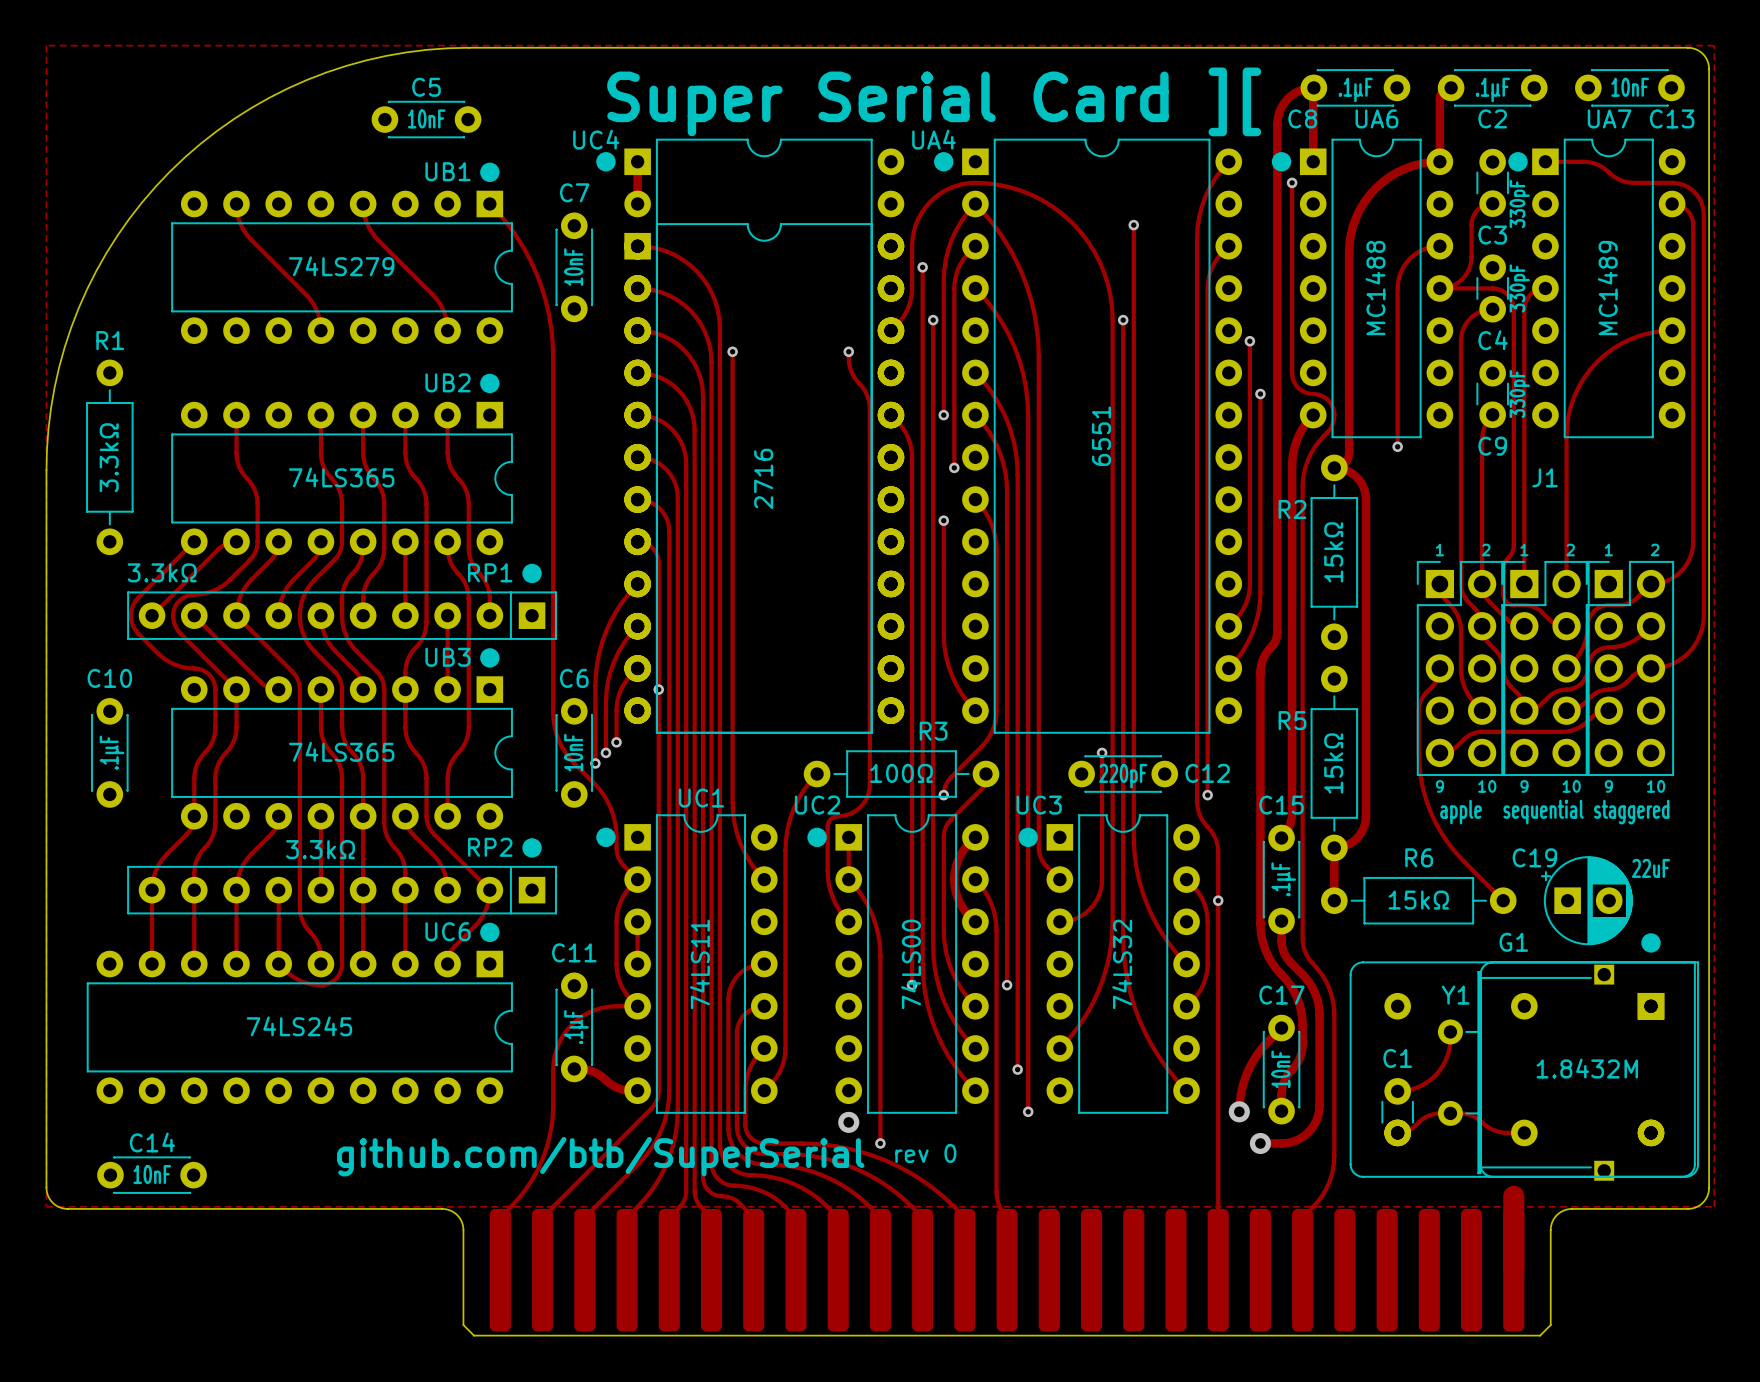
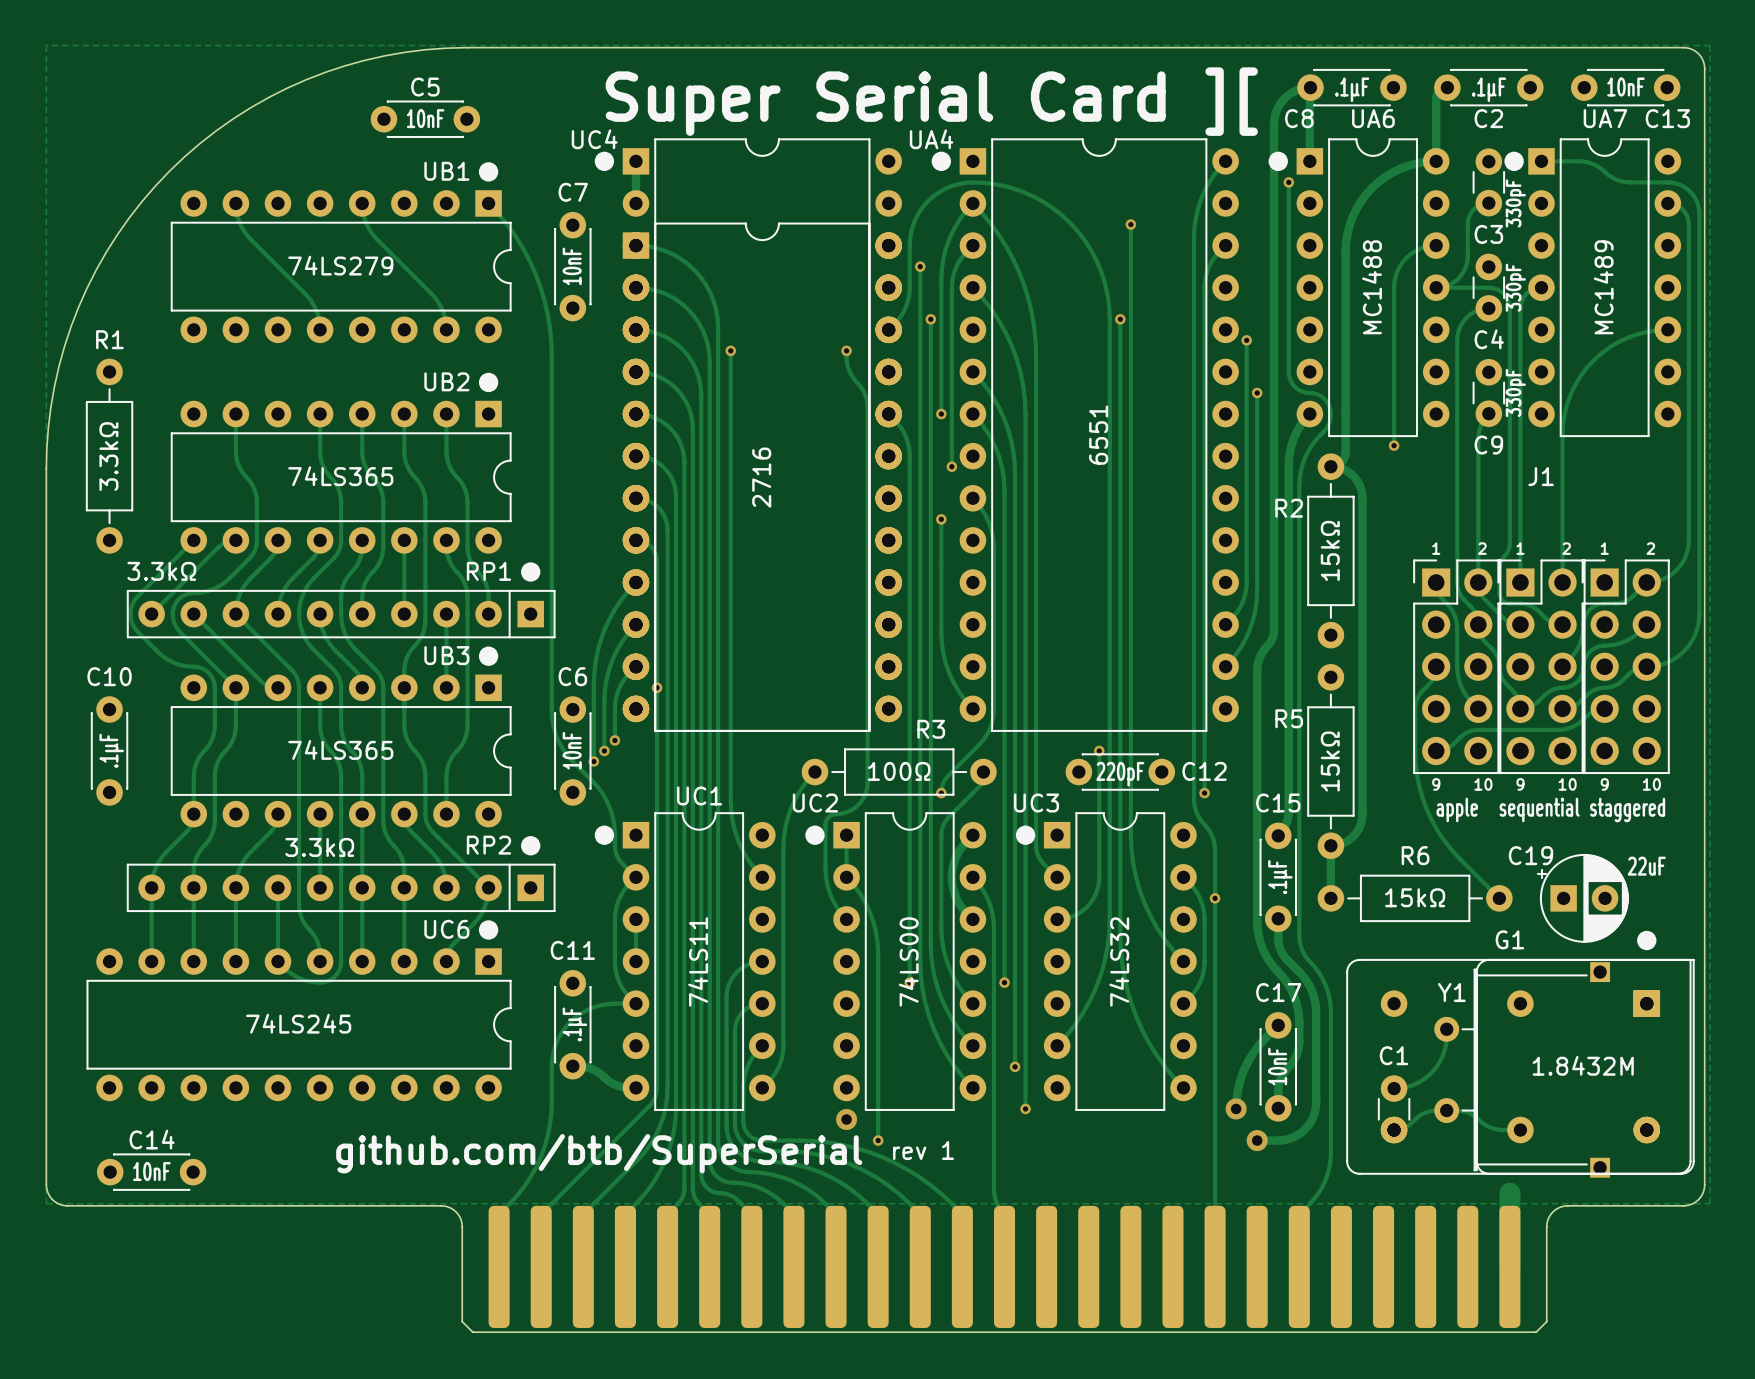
text: rev 0 (925, 1153) -> rev 1 (923, 1150)

